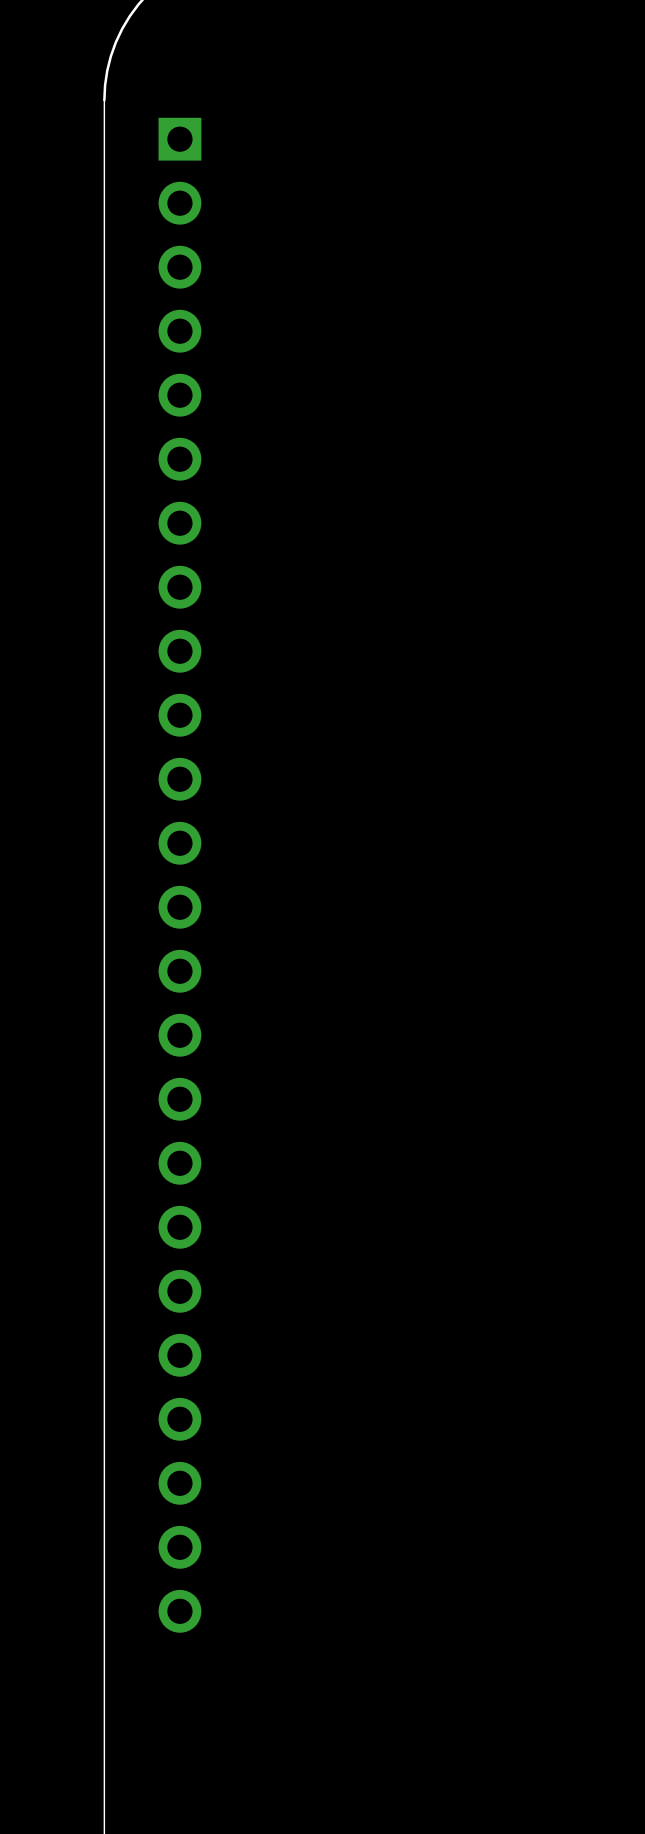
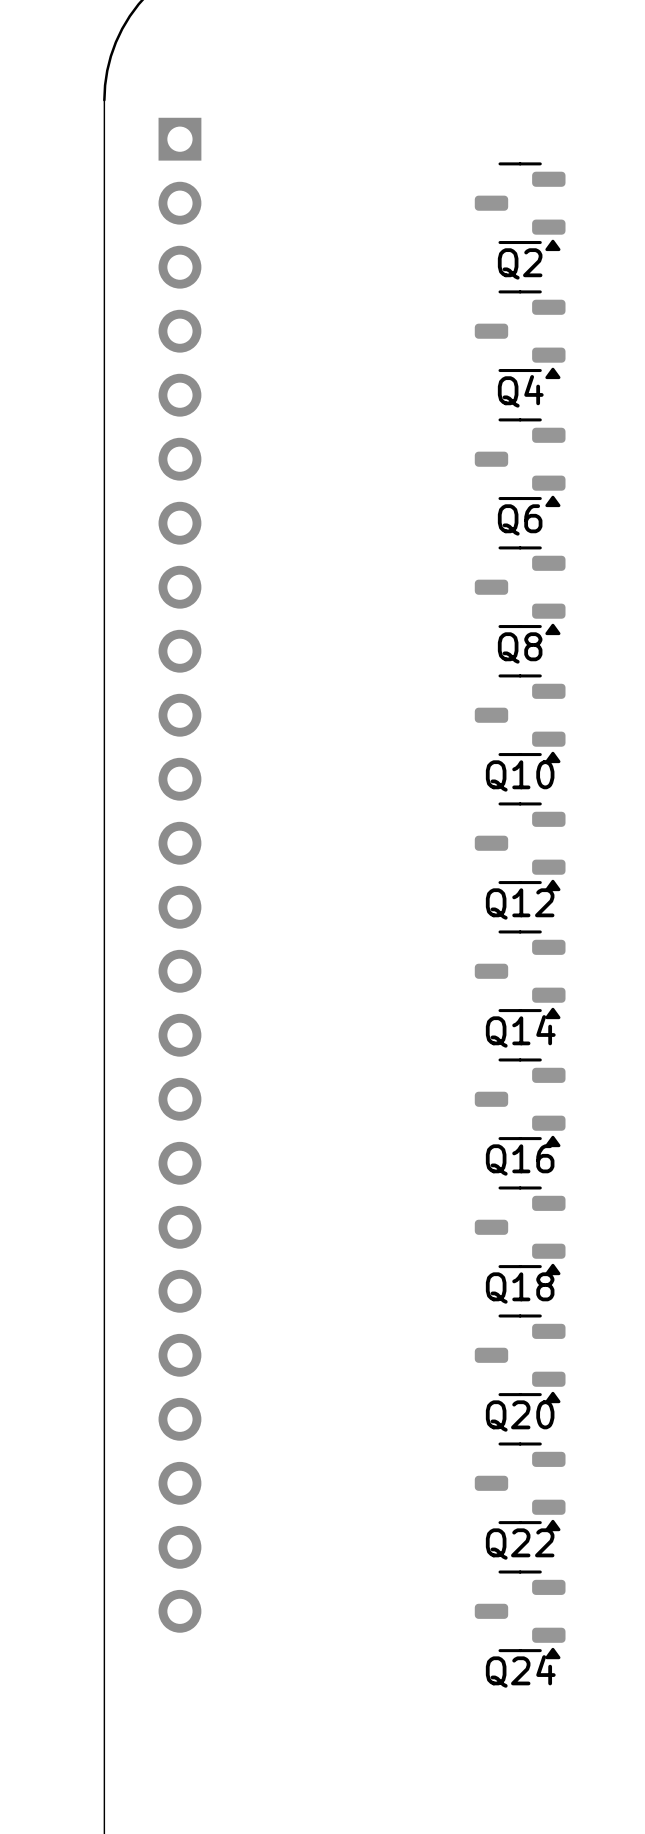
Q2: none -> (520, 206)
Q4: none -> (520, 334)
Q6: none -> (520, 462)
Q8: none -> (520, 590)
Q10: none -> (520, 718)
Q12: none -> (520, 846)
Q14: none -> (520, 974)
Q16: none -> (520, 1102)
Q18: none -> (520, 1230)
Q20: none -> (520, 1358)
Q22: none -> (520, 1486)
Q24: none -> (520, 1614)

